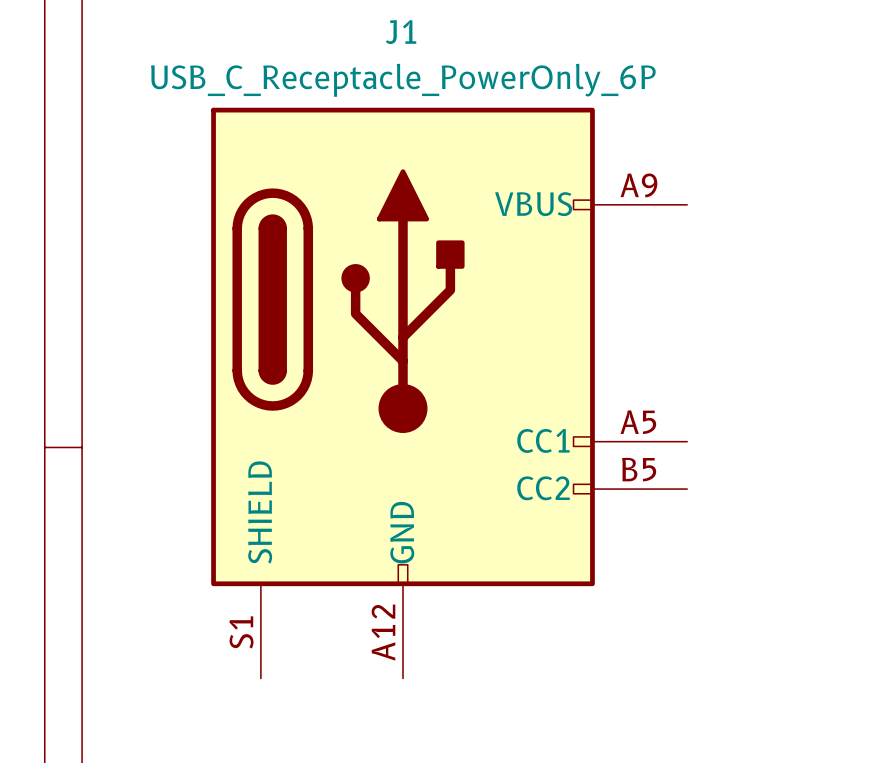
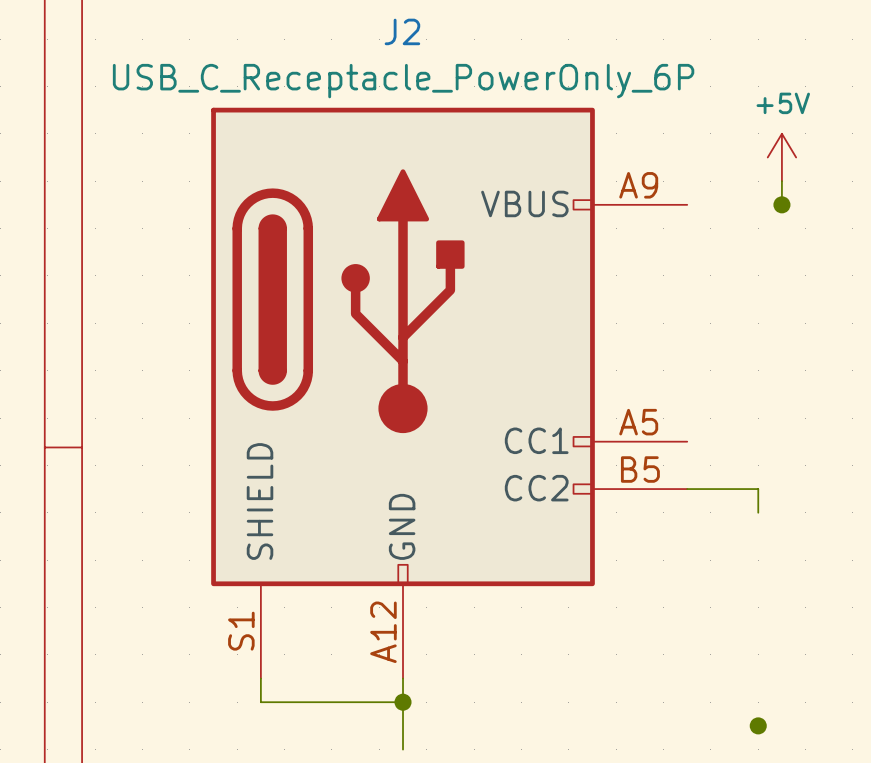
J1 name: J1 (401, 32) -> J2 (402, 31)
power symbol: none -> +5V (781, 157)
wire: none -> (781, 181) (781, 204)
junction: none -> (781, 204)
wire: none -> (687, 489) (758, 489) (758, 512)
wire: none -> (260, 678) (260, 702) (403, 702)
wire: none -> (403, 678) (403, 749)
junction: none -> (403, 702)
junction: none -> (758, 725)

